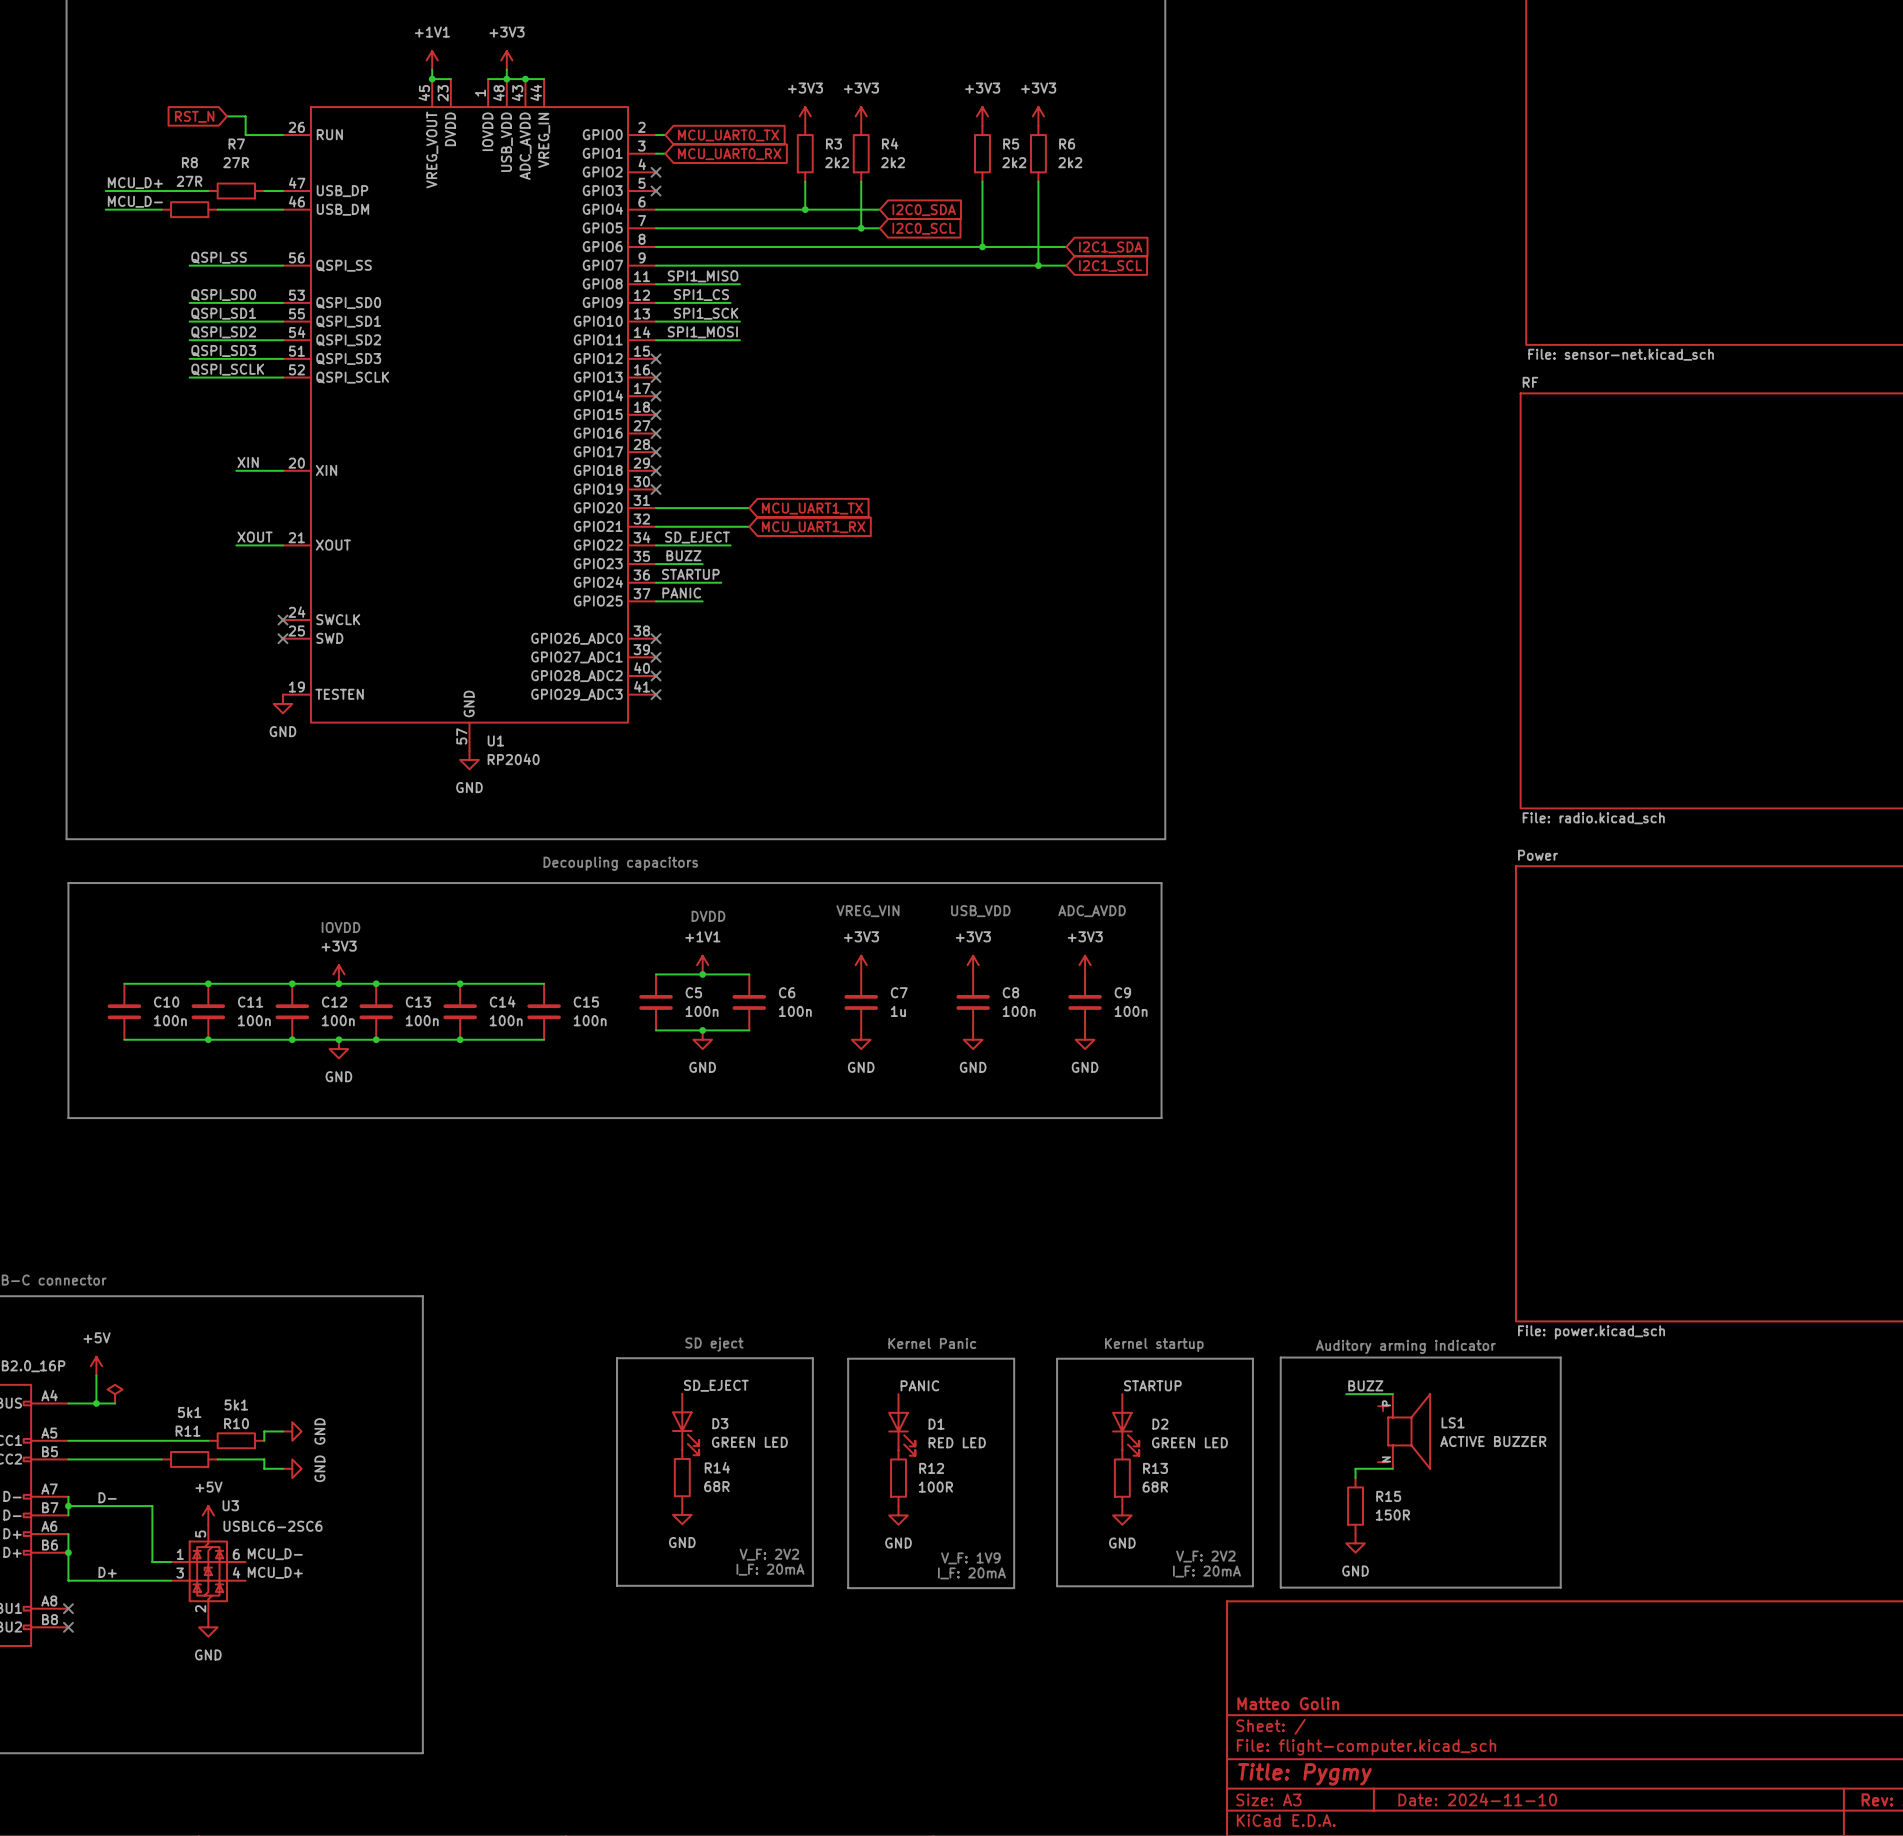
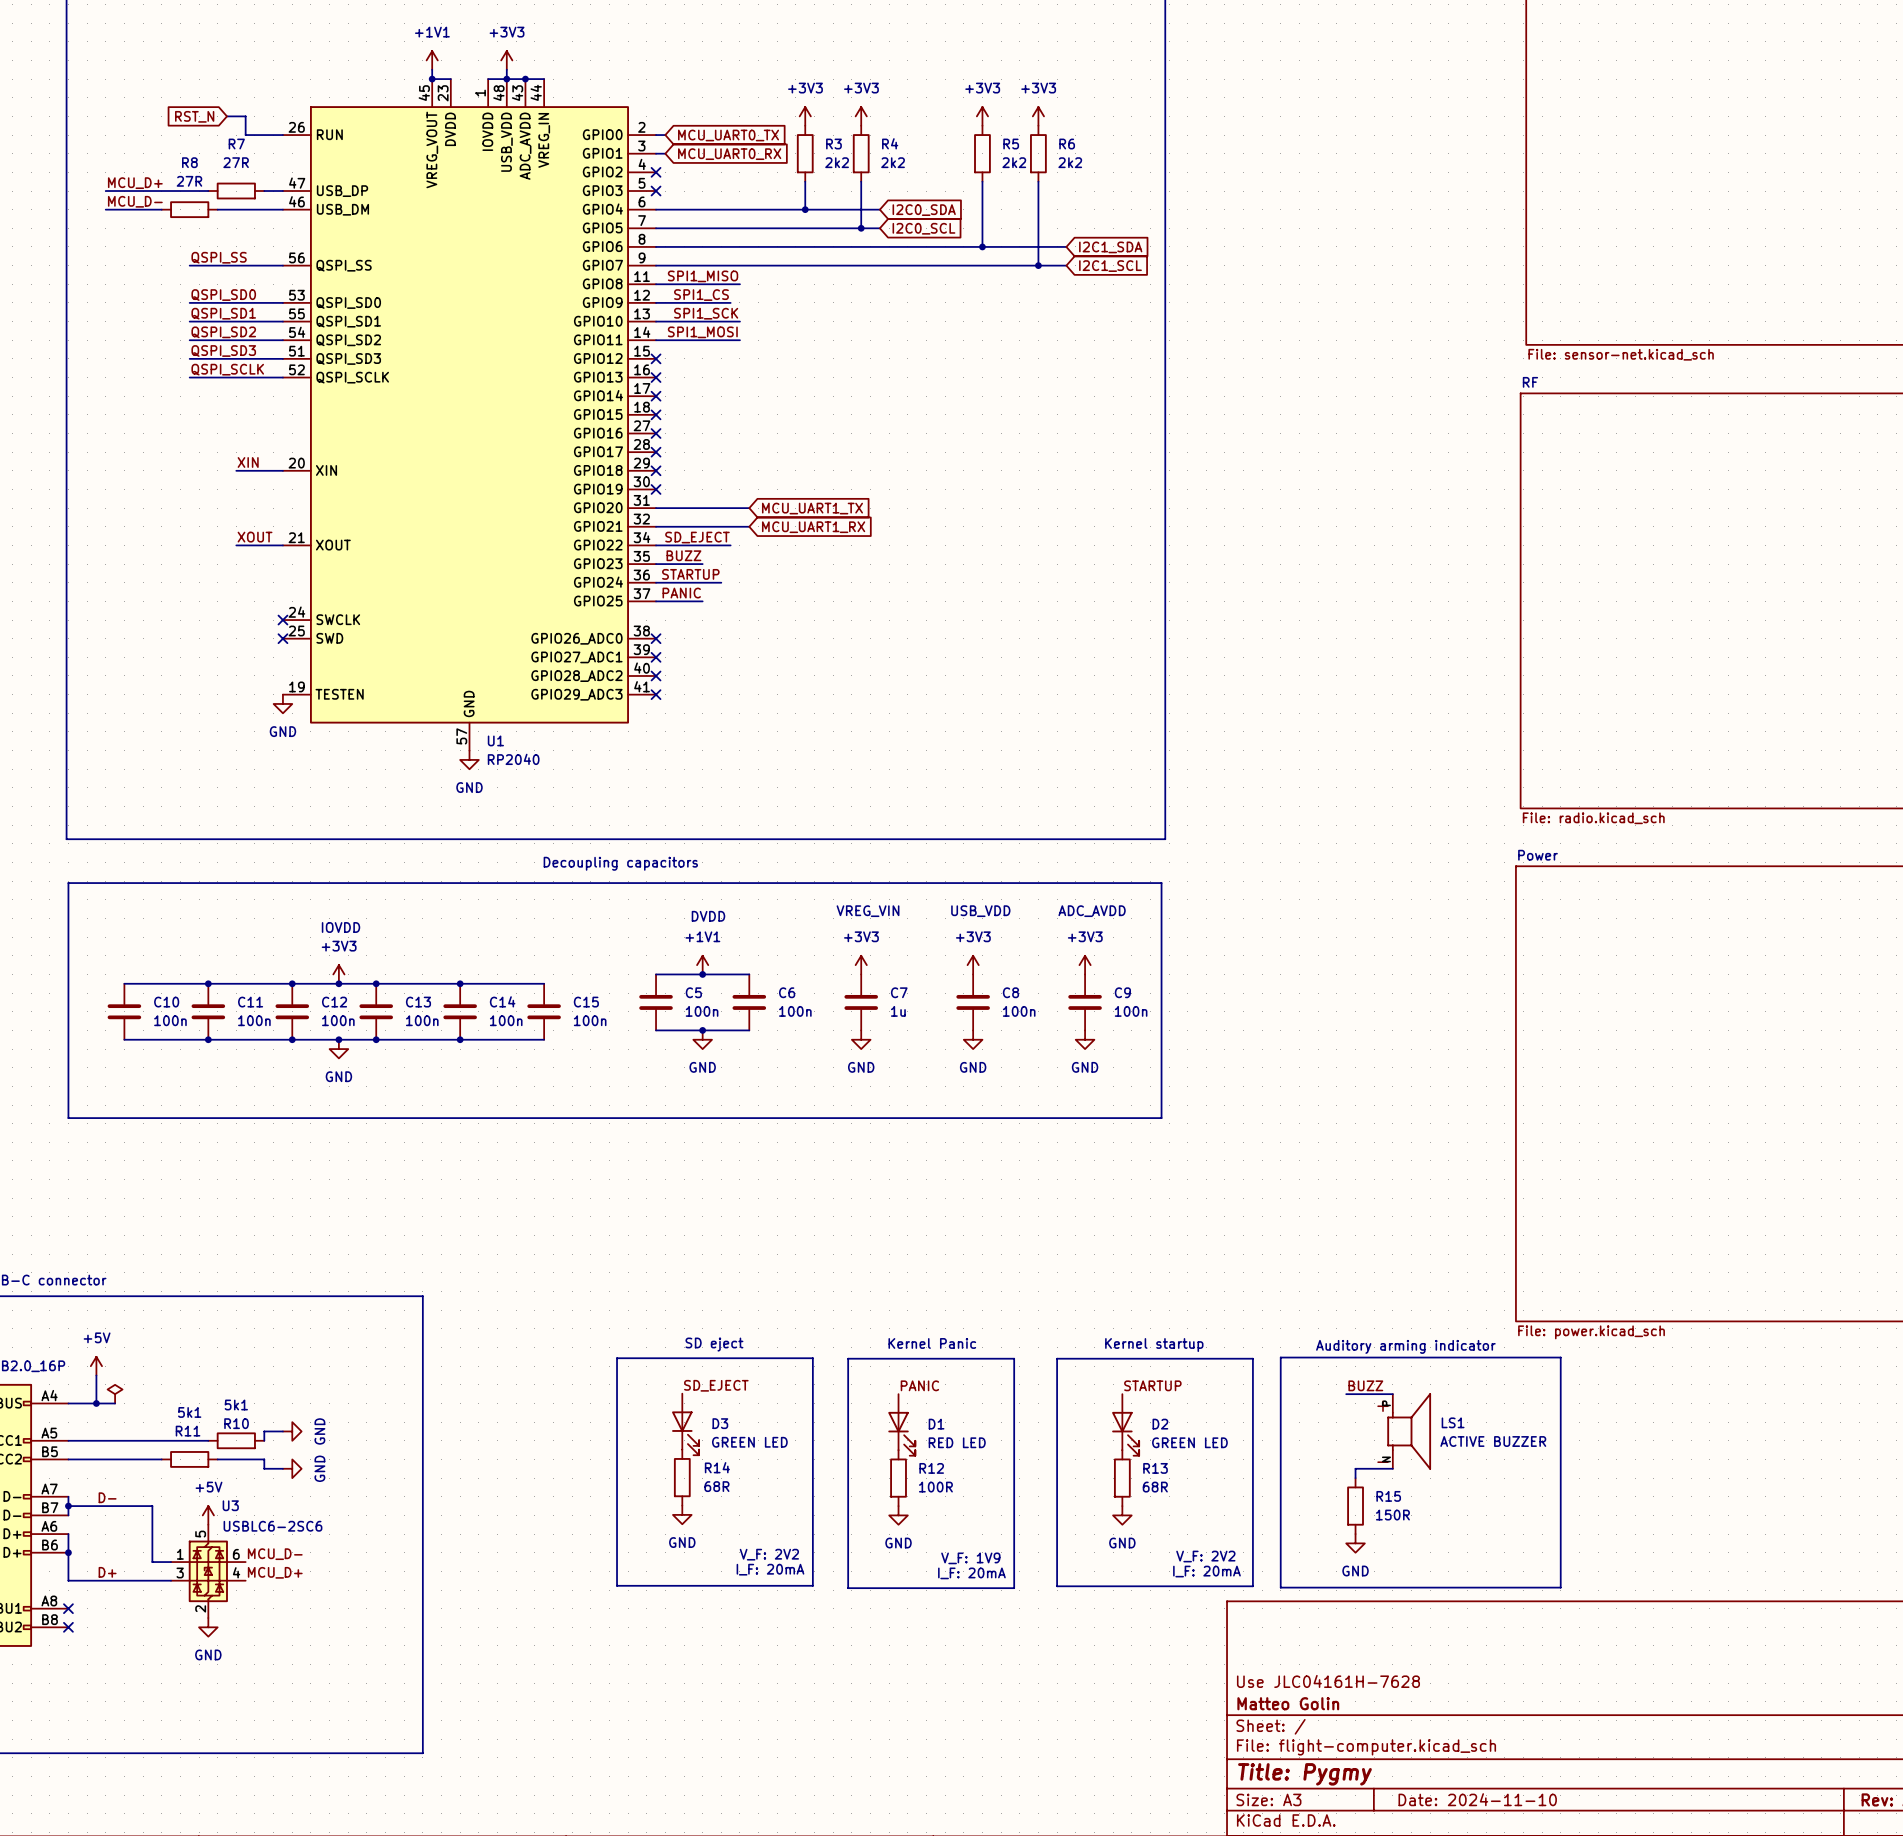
title block: none -> Use JLC04161H-7628 (1328, 1681)

